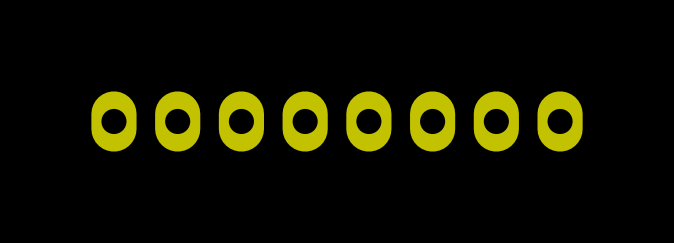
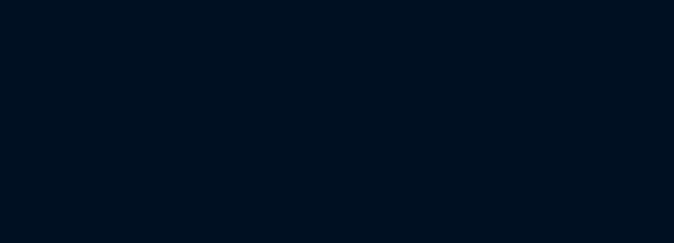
part: (337, 121) -> none

